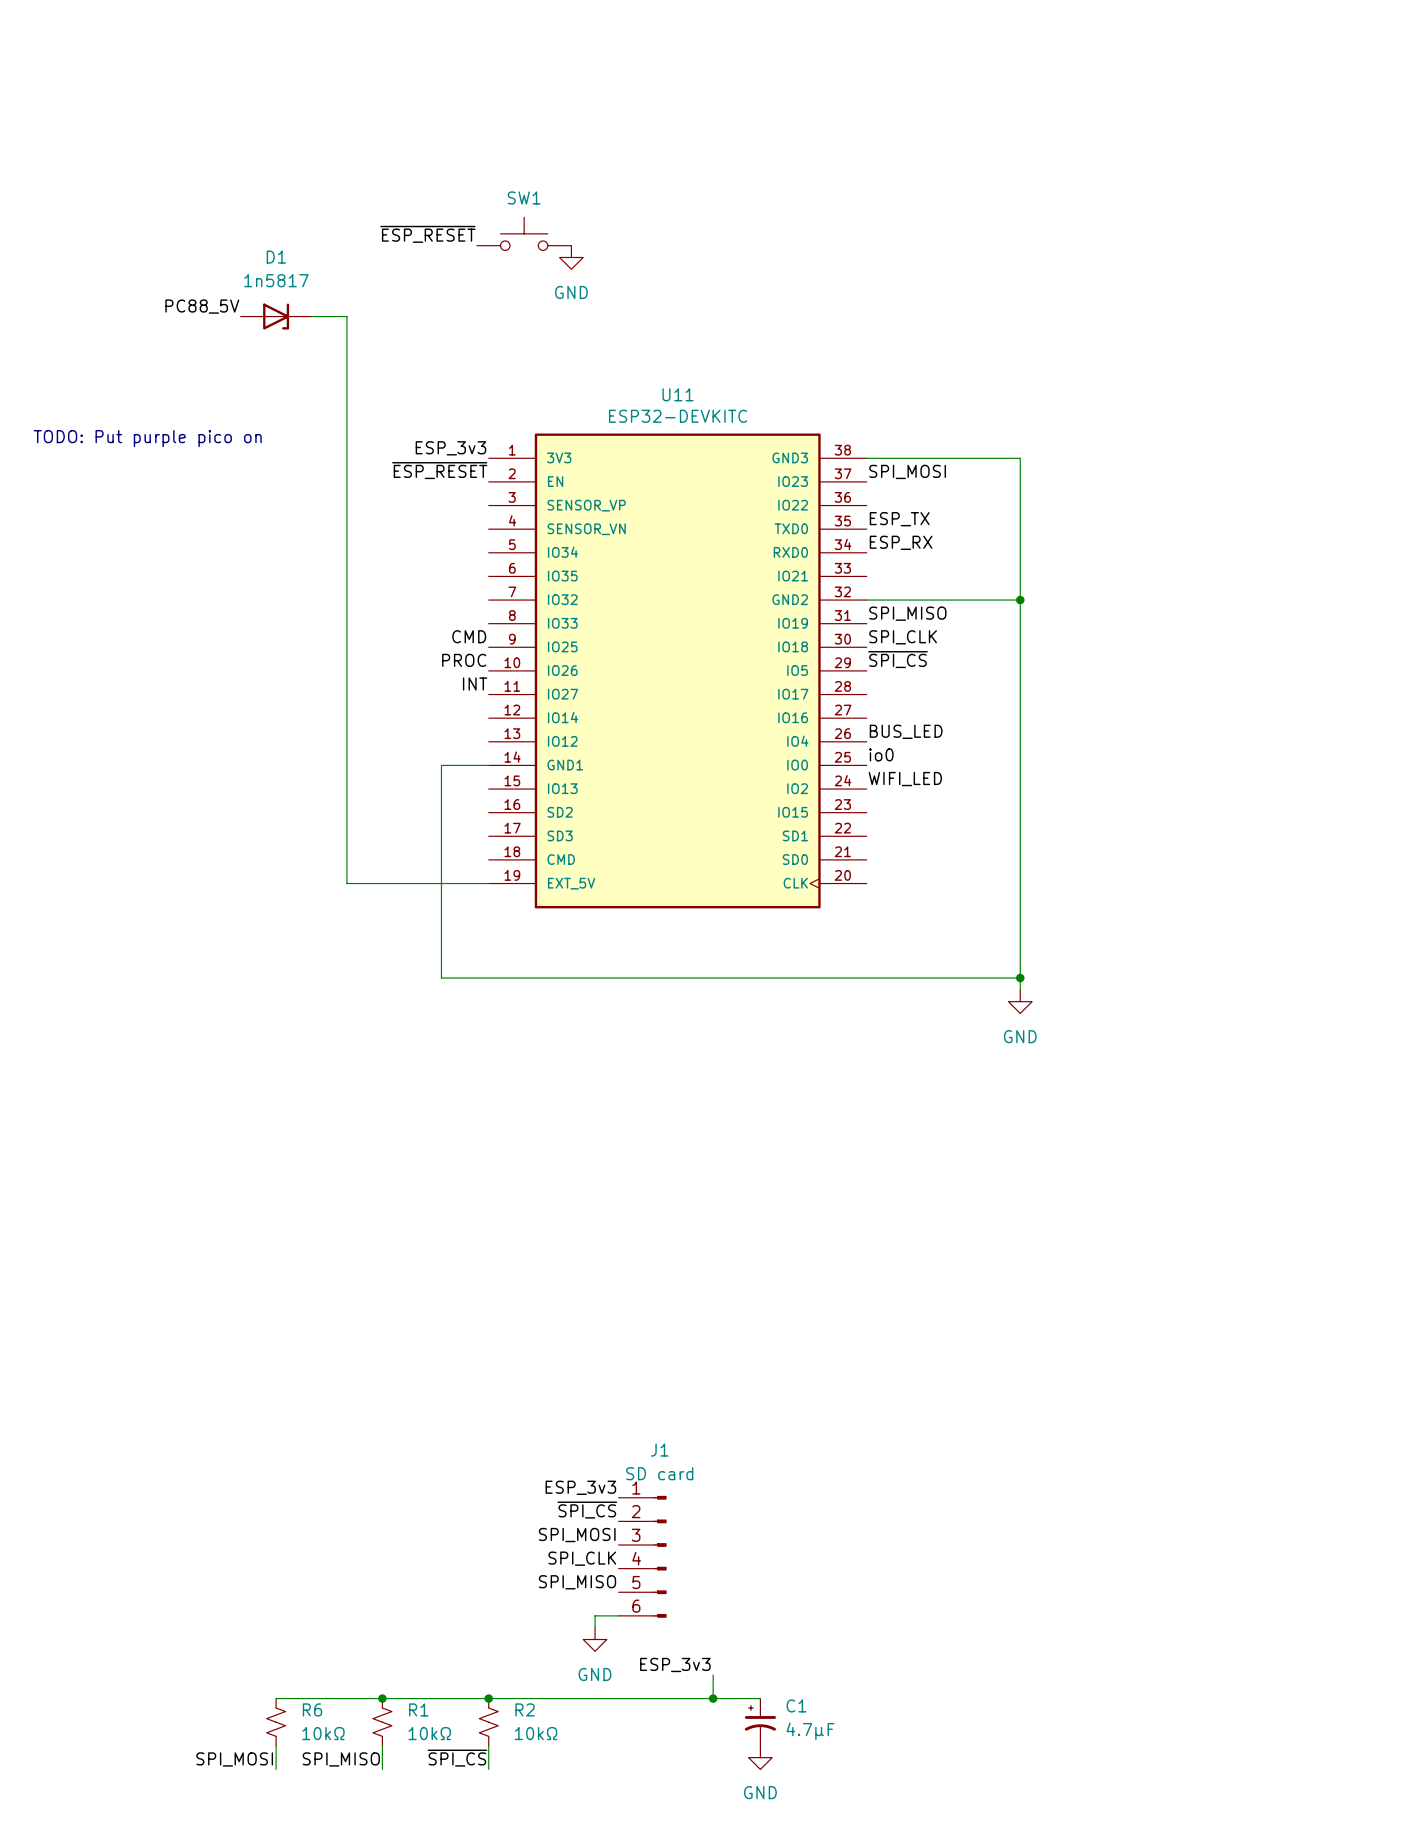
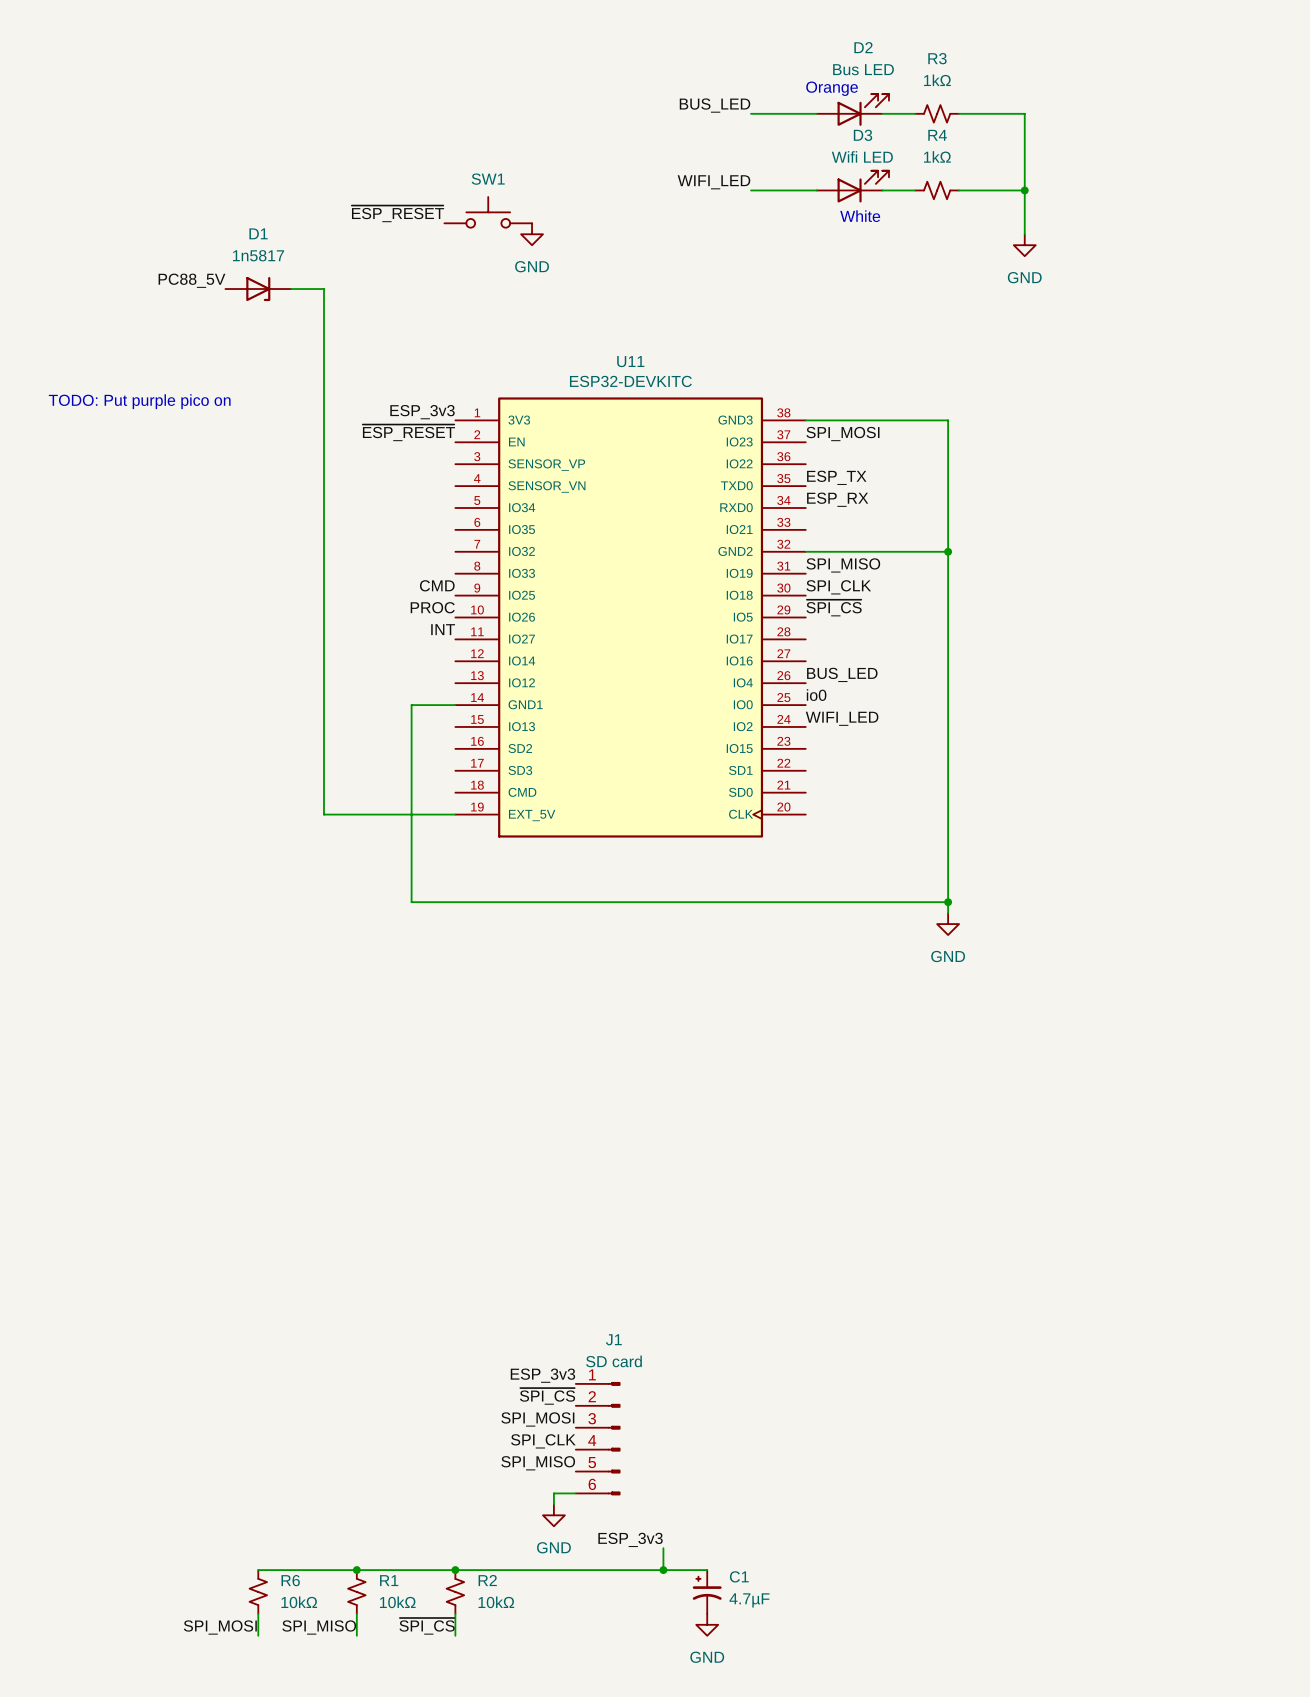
text: none -> Orange (832, 88)
label: none -> BUS_LED (715, 105)
D2: none -> Bus LED (852, 109)
wire: none -> (751, 113) (816, 113)
wire: none -> (882, 113) (915, 113)
R3: none -> 1kΩ (937, 113)
wire: none -> (959, 113) (1024, 113) (1024, 234)
label: none -> WIFI_LED (713, 182)
D3: none -> Wifi LED (852, 186)
wire: none -> (751, 190) (816, 190)
wire: none -> (882, 190) (915, 190)
R4: none -> 1kΩ (937, 190)
wire: none -> (959, 190) (1024, 190)
junction: none -> (1024, 190)
text: none -> White (860, 216)
power symbol: none -> GND (1024, 245)

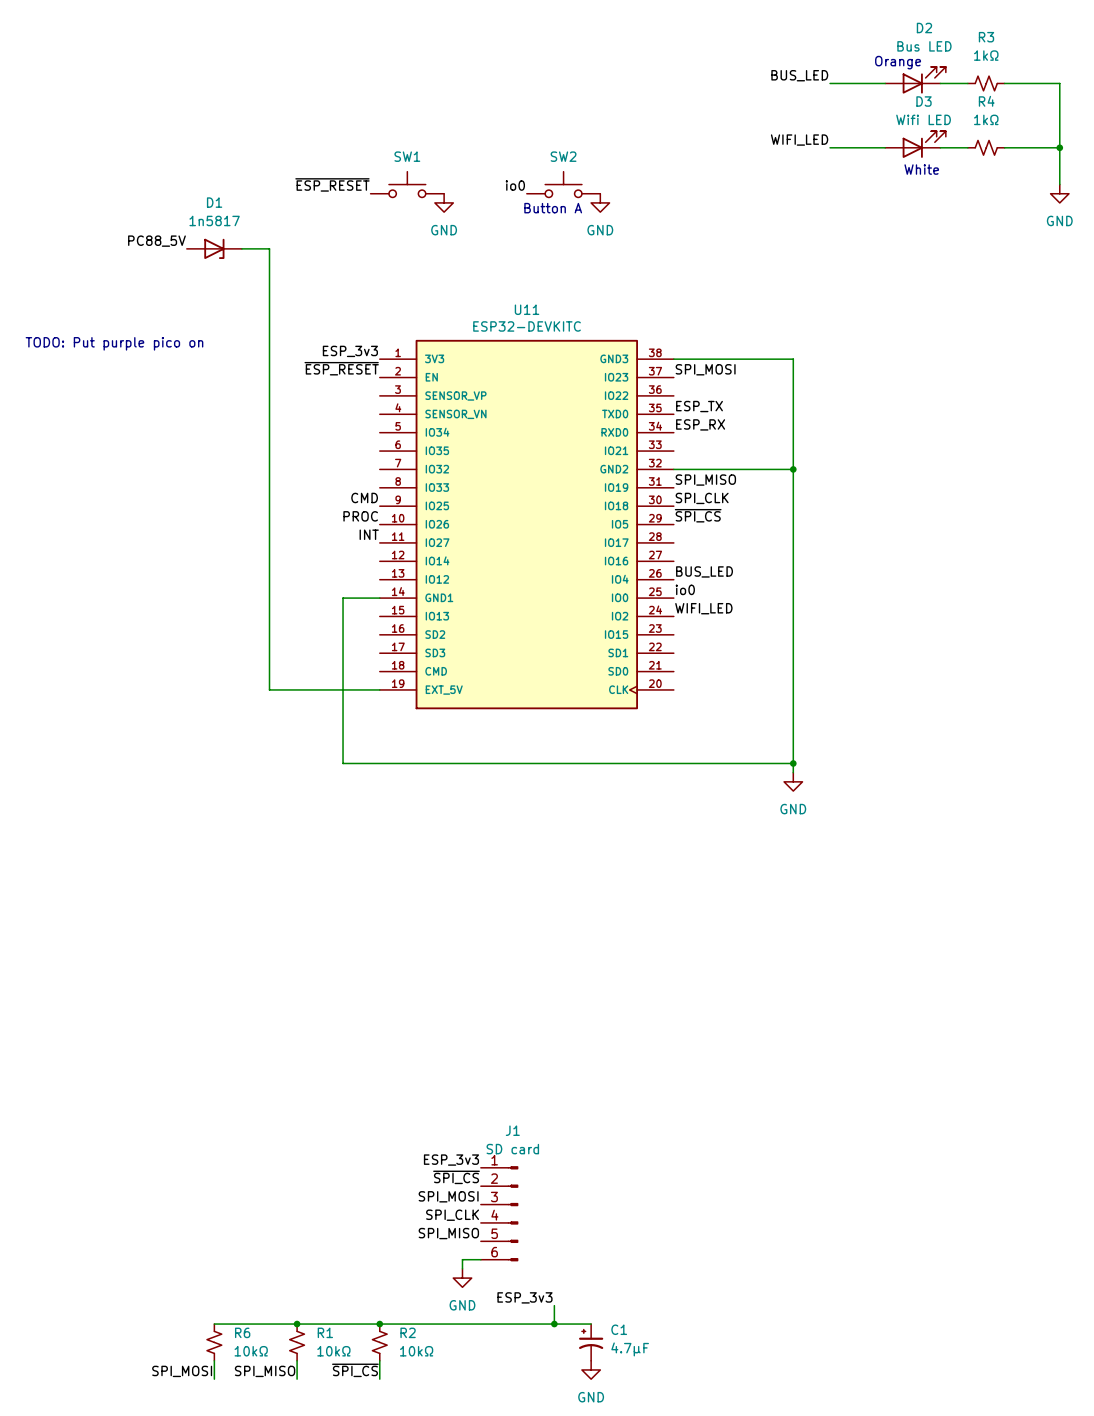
text: none -> Orange (898, 62)
label: none -> BUS_LED (799, 75)
text: Orange (832, 88) -> none
wire: none -> (830, 83) (885, 83)
wire: none -> (940, 83) (967, 83)
wire: none -> (1004, 83) (1059, 83) (1059, 184)
label: BUS_LED (715, 105) -> none
D2 position: (852, 109) -> (915, 80)
wire: (751, 113) (816, 113) -> none
wire: (882, 113) (915, 113) -> none
R3 position: (937, 113) -> (986, 83)
wire: (959, 113) (1024, 113) (1024, 234) -> none
label: none -> WIFI_LED (799, 140)
wire: none -> (940, 147) (967, 147)
wire: none -> (1004, 147) (1059, 147)
junction: none -> (1059, 147)
label: WIFI_LED (713, 182) -> none
D3 position: (852, 186) -> (915, 144)
wire: (751, 190) (816, 190) -> none
wire: (882, 190) (915, 190) -> none
R4 position: (937, 190) -> (986, 147)
wire: (959, 190) (1024, 190) -> (830, 147) (885, 147)
junction: (1024, 190) -> none
text: none -> White (921, 169)
SW2: none -> (563, 184)
label: none -> io0 (515, 185)
text: White (860, 216) -> none
power symbol: none -> GND (1059, 193)
power symbol: none -> GND (600, 202)
text: none -> Button A (553, 208)
power symbol: GND (1024, 245) -> none

